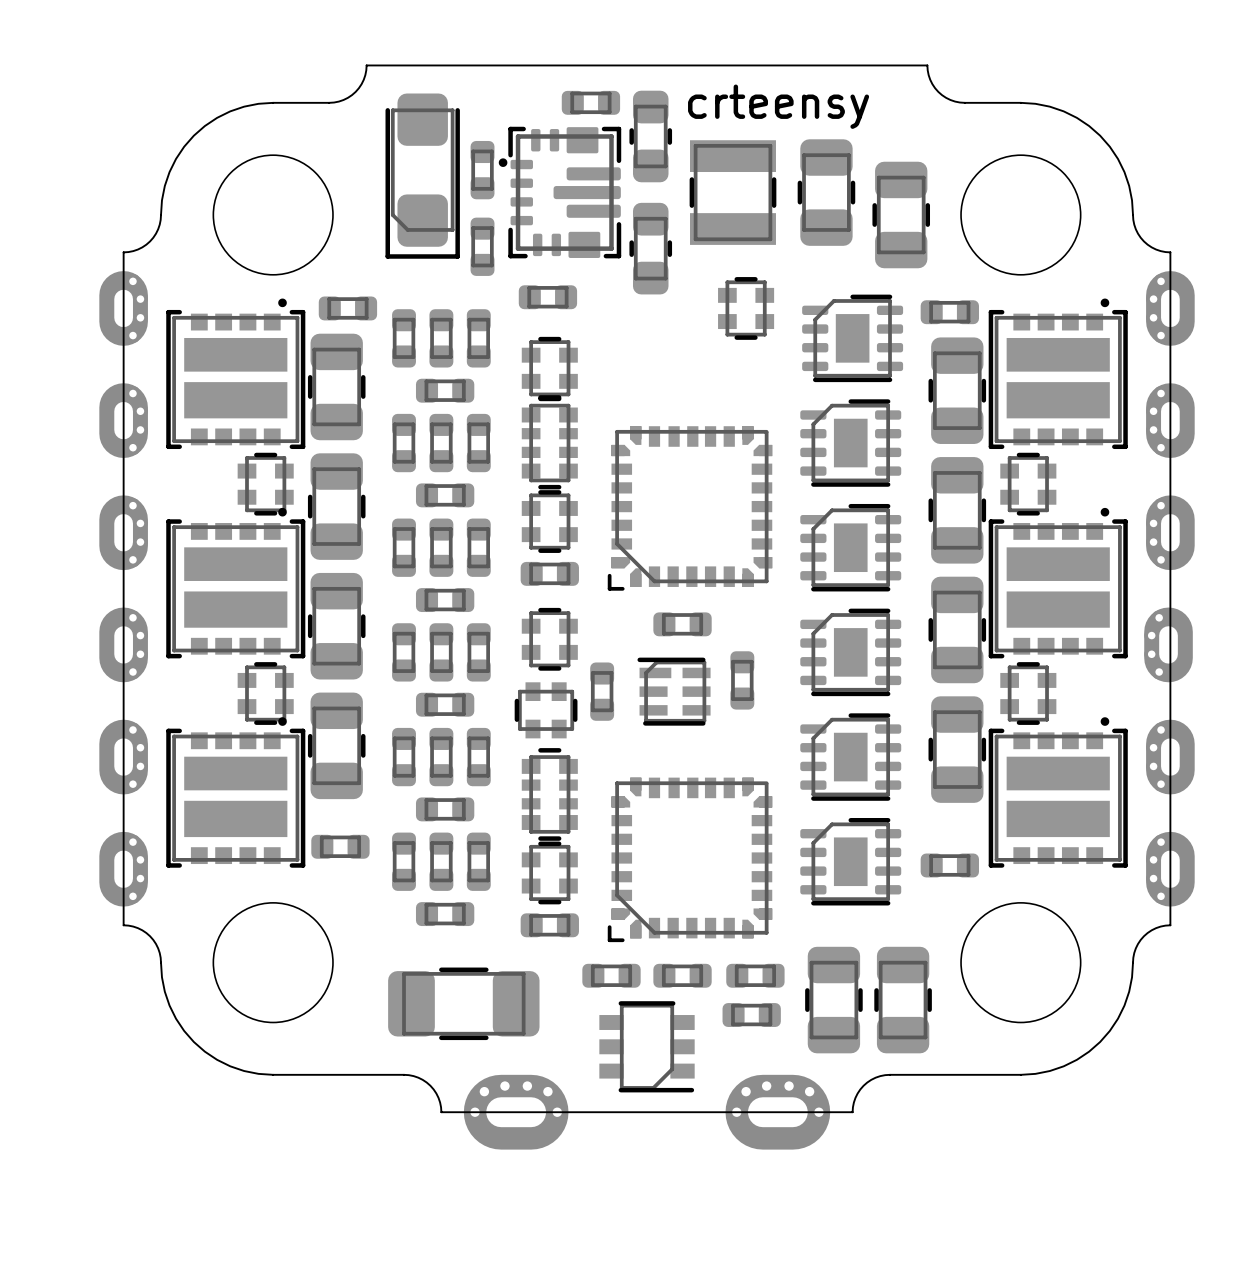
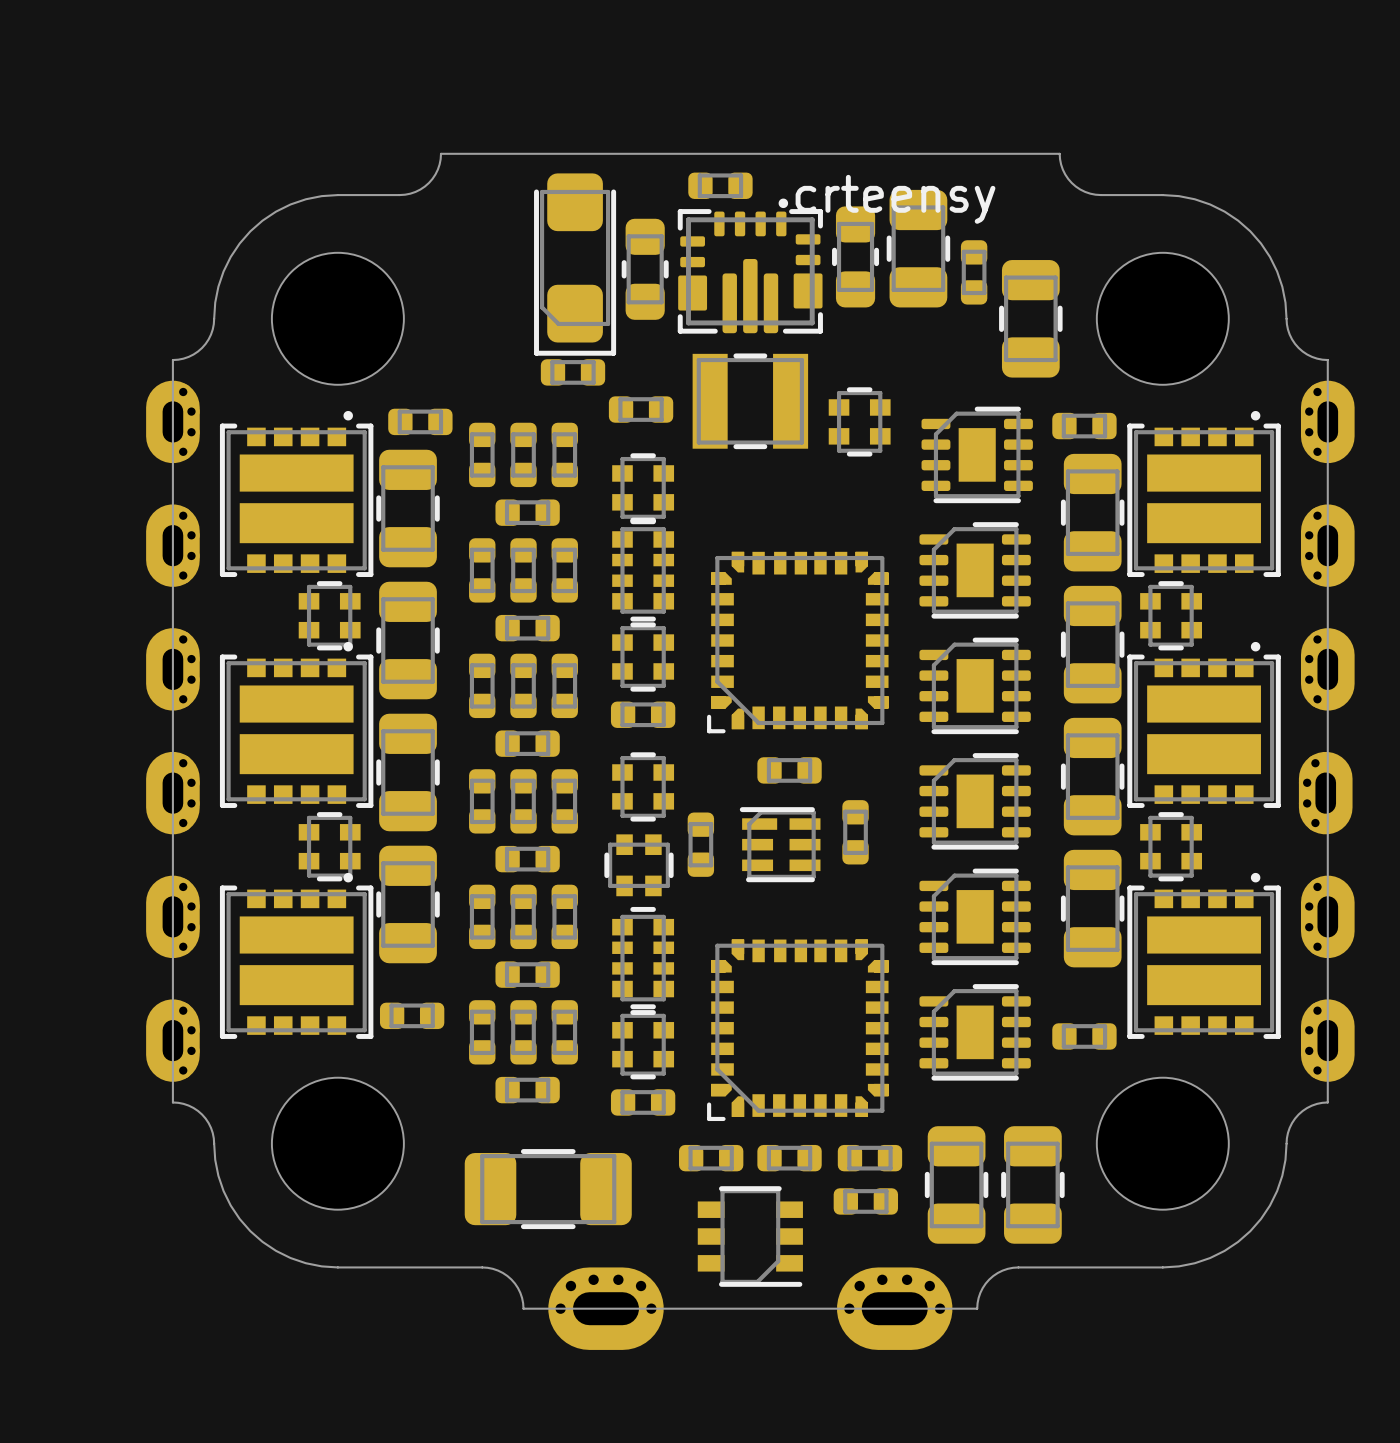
part position: (590, 102) -> (720, 185)
part footprint: [498, 126, 622, 259] -> [621, 218, 669, 320]
part: (650, 136) -> none
part footprint: [470, 140, 495, 200] -> [534, 173, 617, 356]
part footprint: [689, 140, 777, 245] -> [832, 206, 880, 308]
part: none -> (750, 266)
part: none -> (974, 272)
part: (422, 176) -> none
part position: (826, 192) -> (918, 248)
part rotation: 0° (482, 246) -> 90° clockwise (573, 372)
part: (650, 248) -> none
part: none -> (750, 401)

